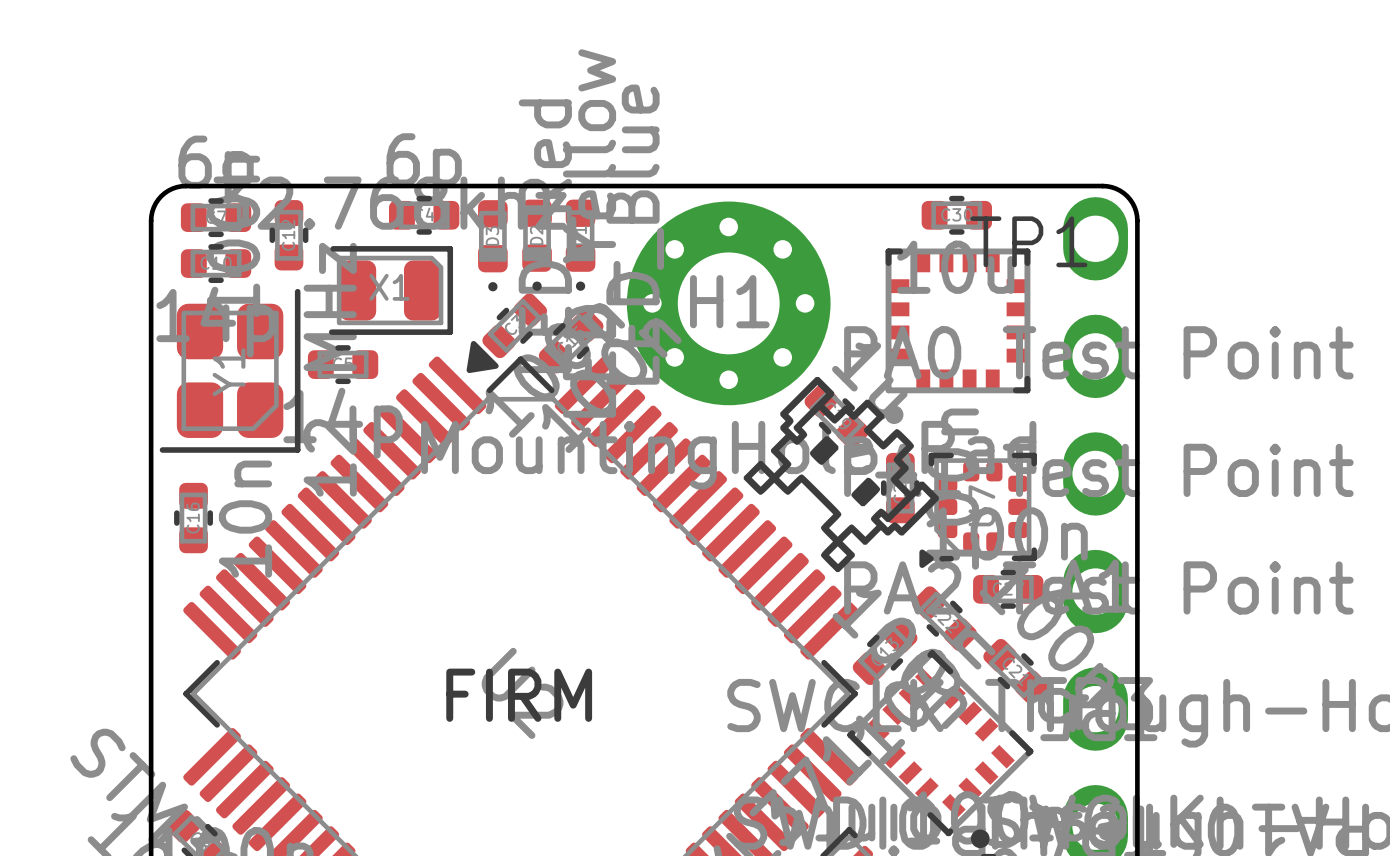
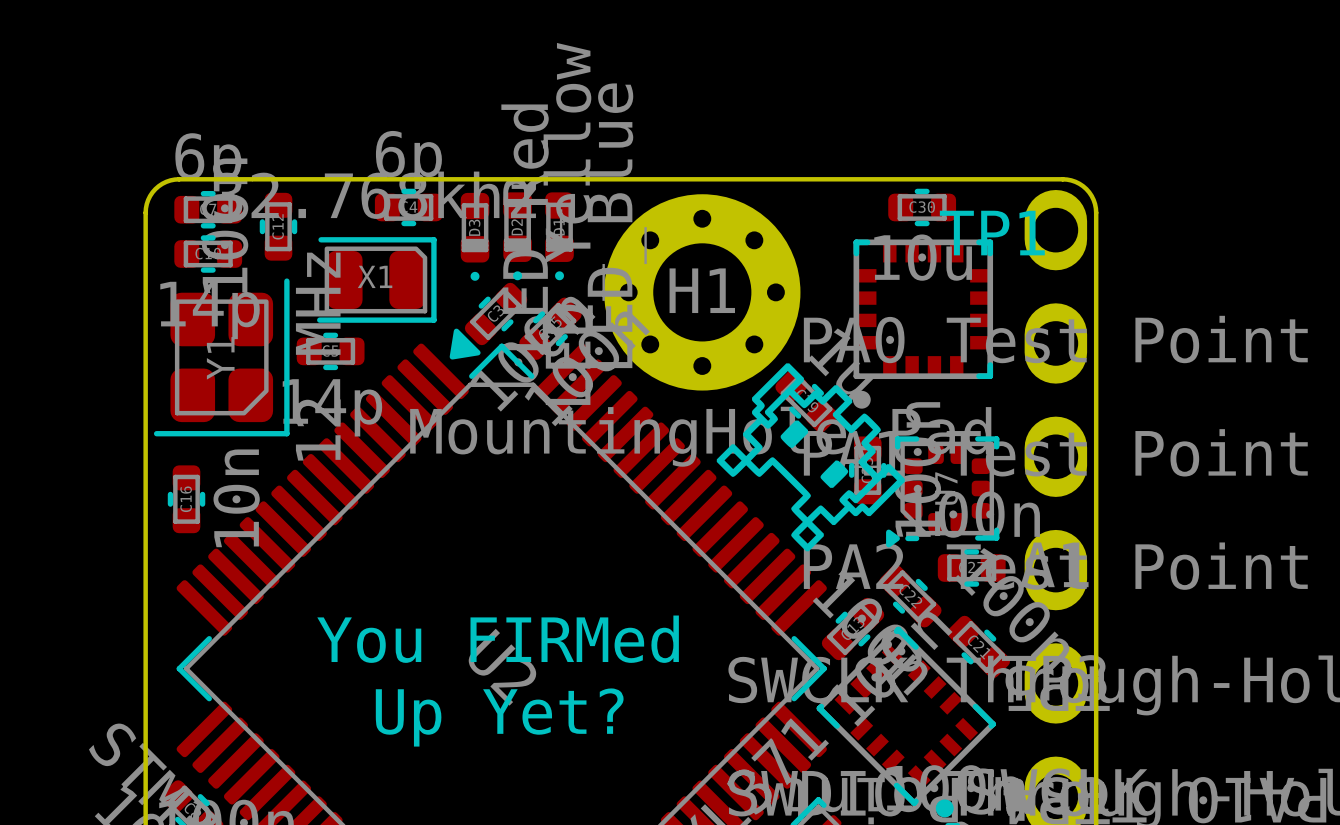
text: none -> You FIRMed (498, 639)
text: FIRM (519, 695) -> none
text: none -> Up Yet? (499, 717)

